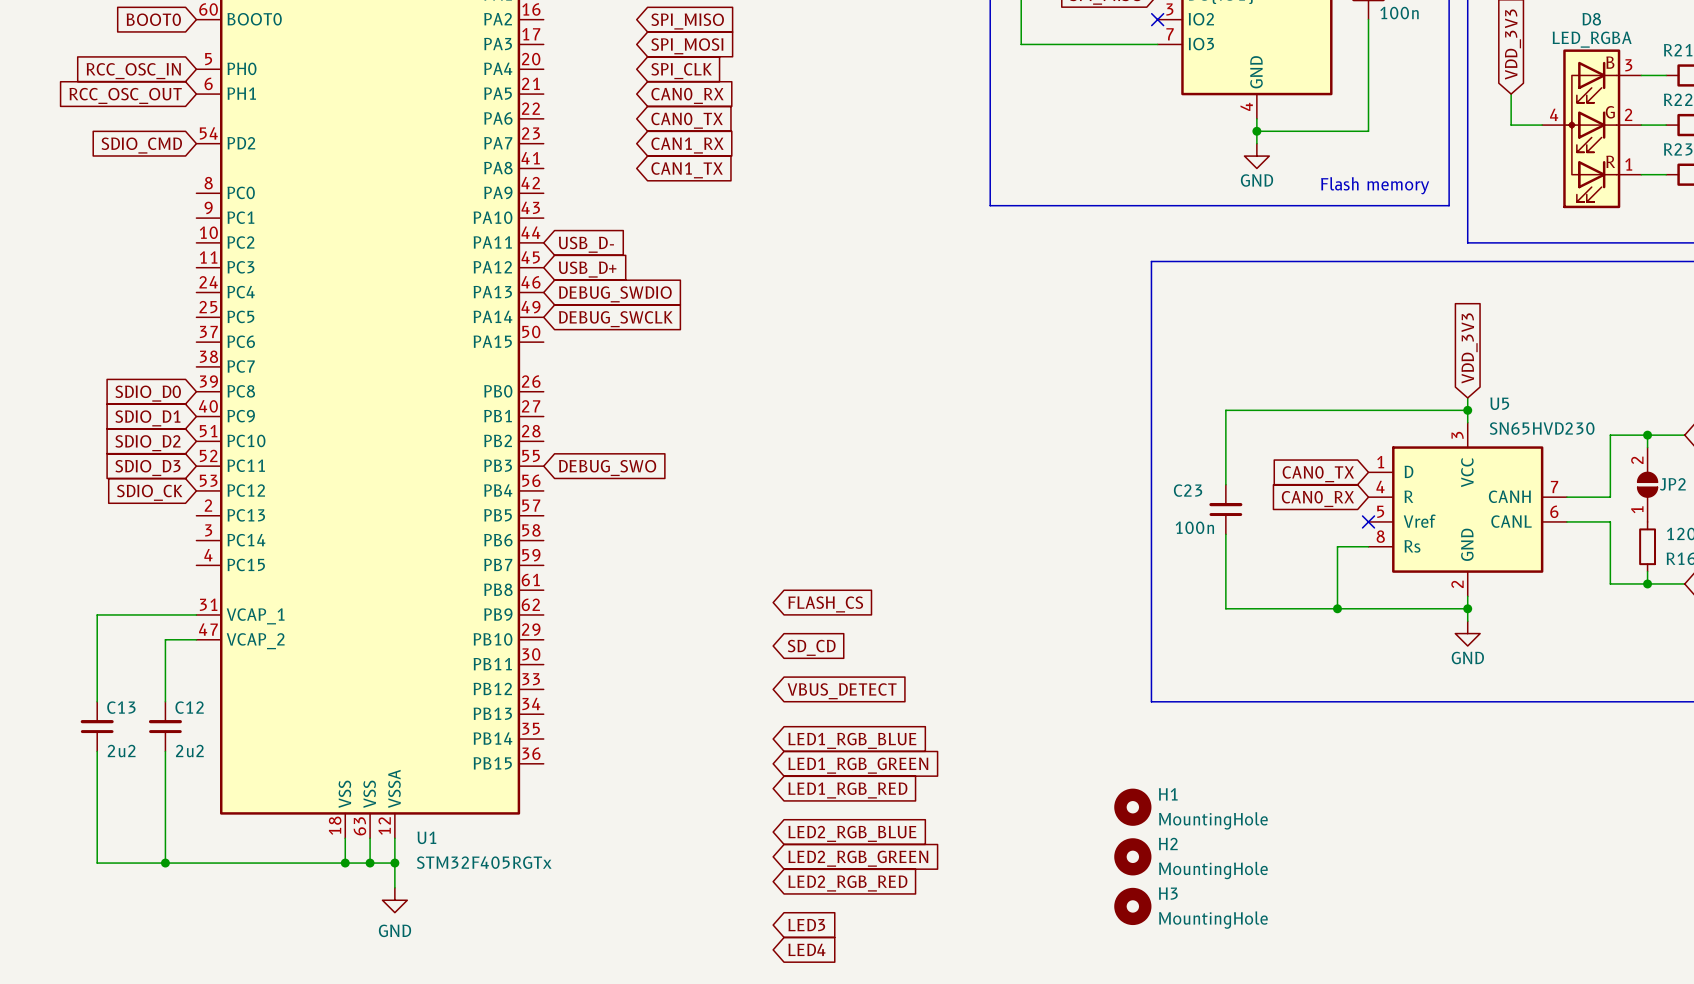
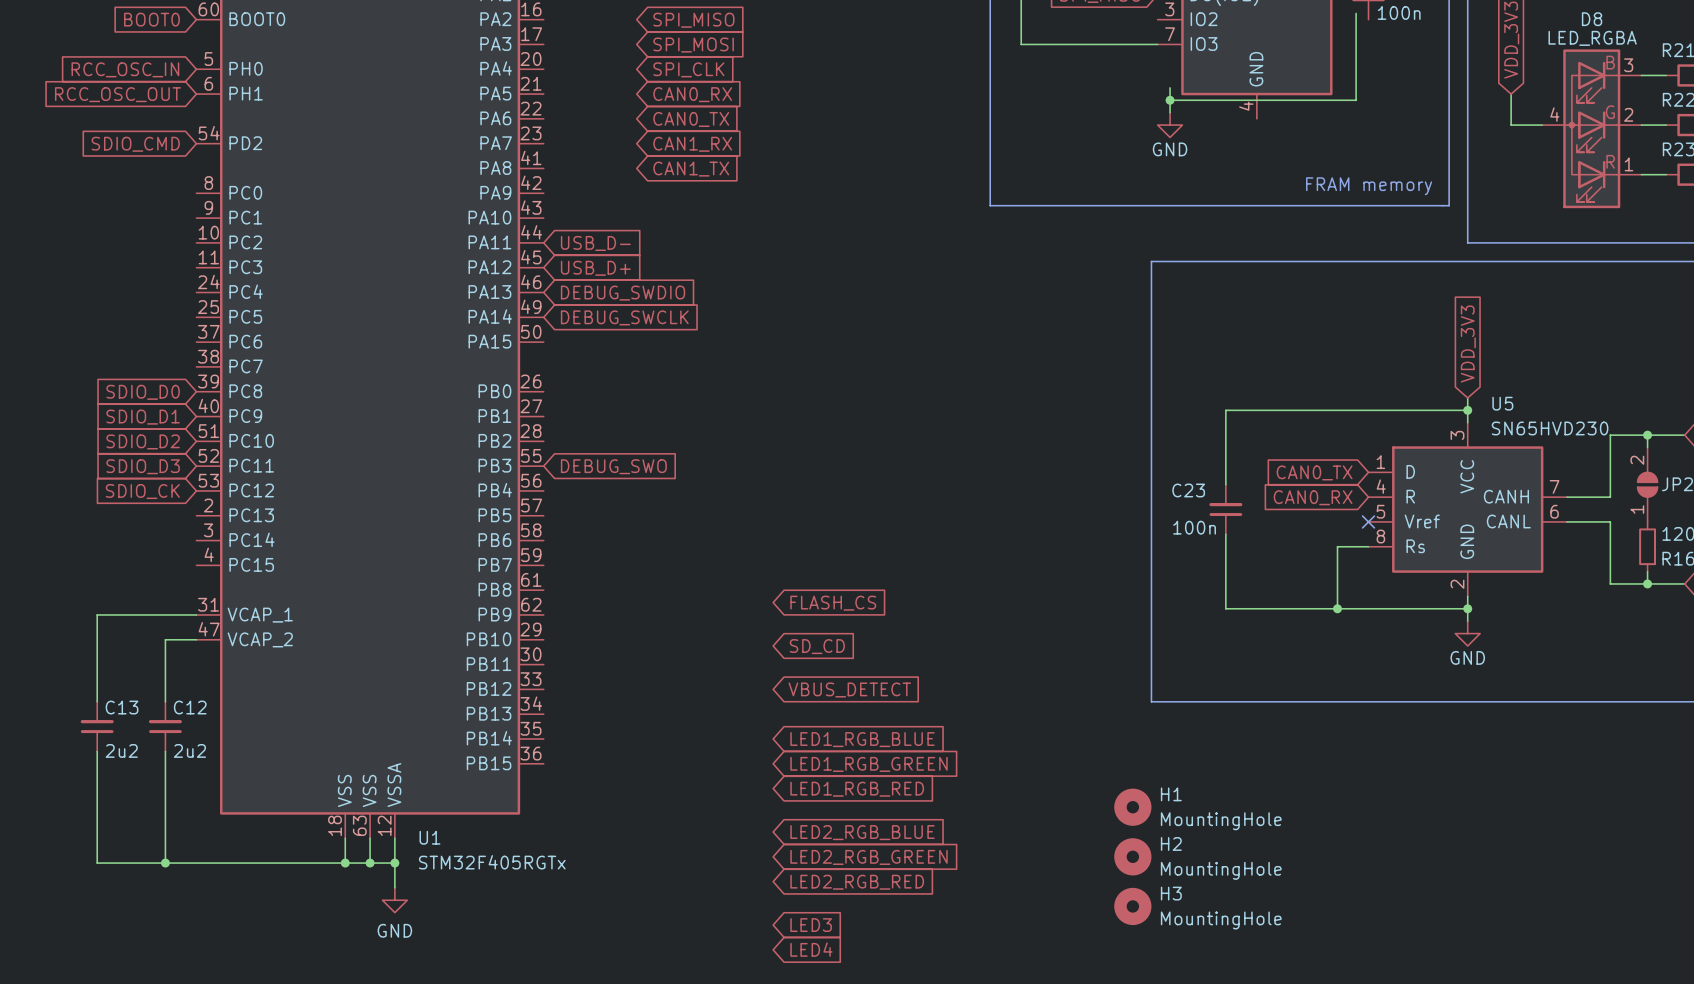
wire: none -> (1356, 13) (1356, 100) (1170, 100)
no-connect mark: (1157, 19) -> none
wire: (1368, 19) (1368, 131) (1256, 131) -> none
junction: none -> (1170, 100)
wire: (1256, 118) (1256, 143) -> (1170, 87) (1170, 112)
junction: (1256, 131) -> none
power symbol position: GND (1256, 156) -> GND (1170, 125)
text: Flash memory (1375, 185) -> FRAM memory (1369, 186)

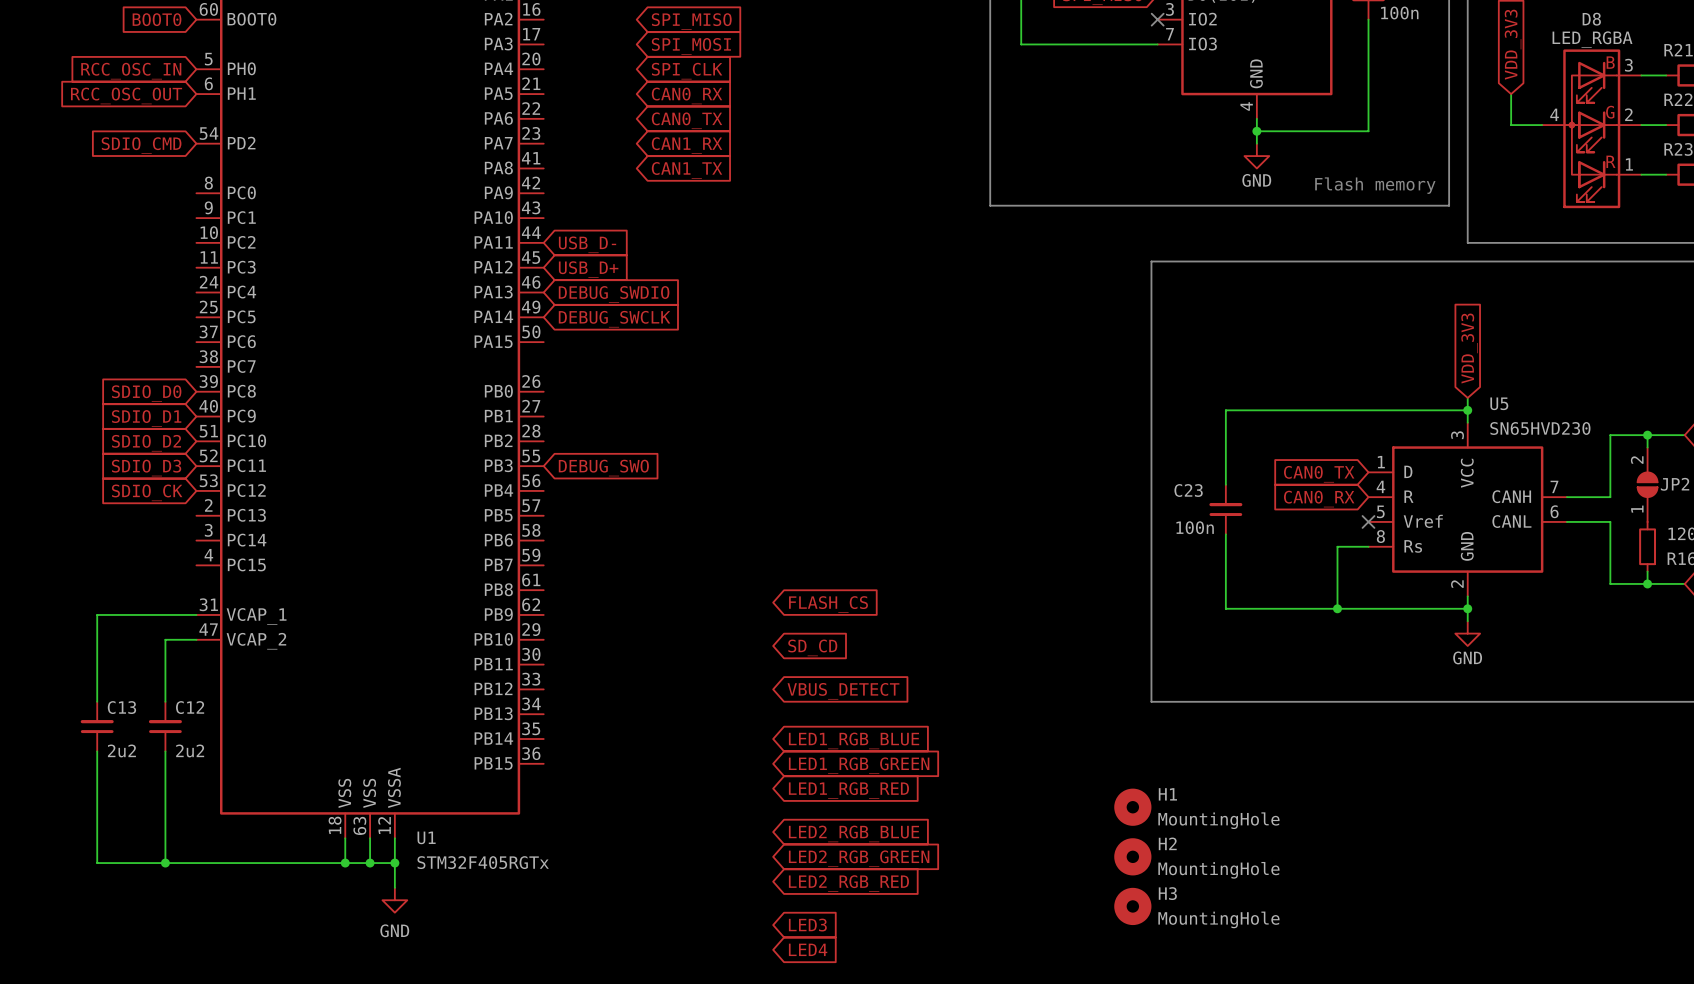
wire: (1356, 13) (1356, 100) (1170, 100) -> none
no-connect mark: none -> (1157, 19)
wire: none -> (1368, 19) (1368, 131) (1256, 131)
wire: (1170, 87) (1170, 112) -> (1256, 118) (1256, 143)
junction: (1170, 100) -> none
power symbol position: GND (1170, 125) -> GND (1256, 156)
junction: none -> (1256, 131)
text: FRAM memory (1369, 186) -> Flash memory (1375, 185)

